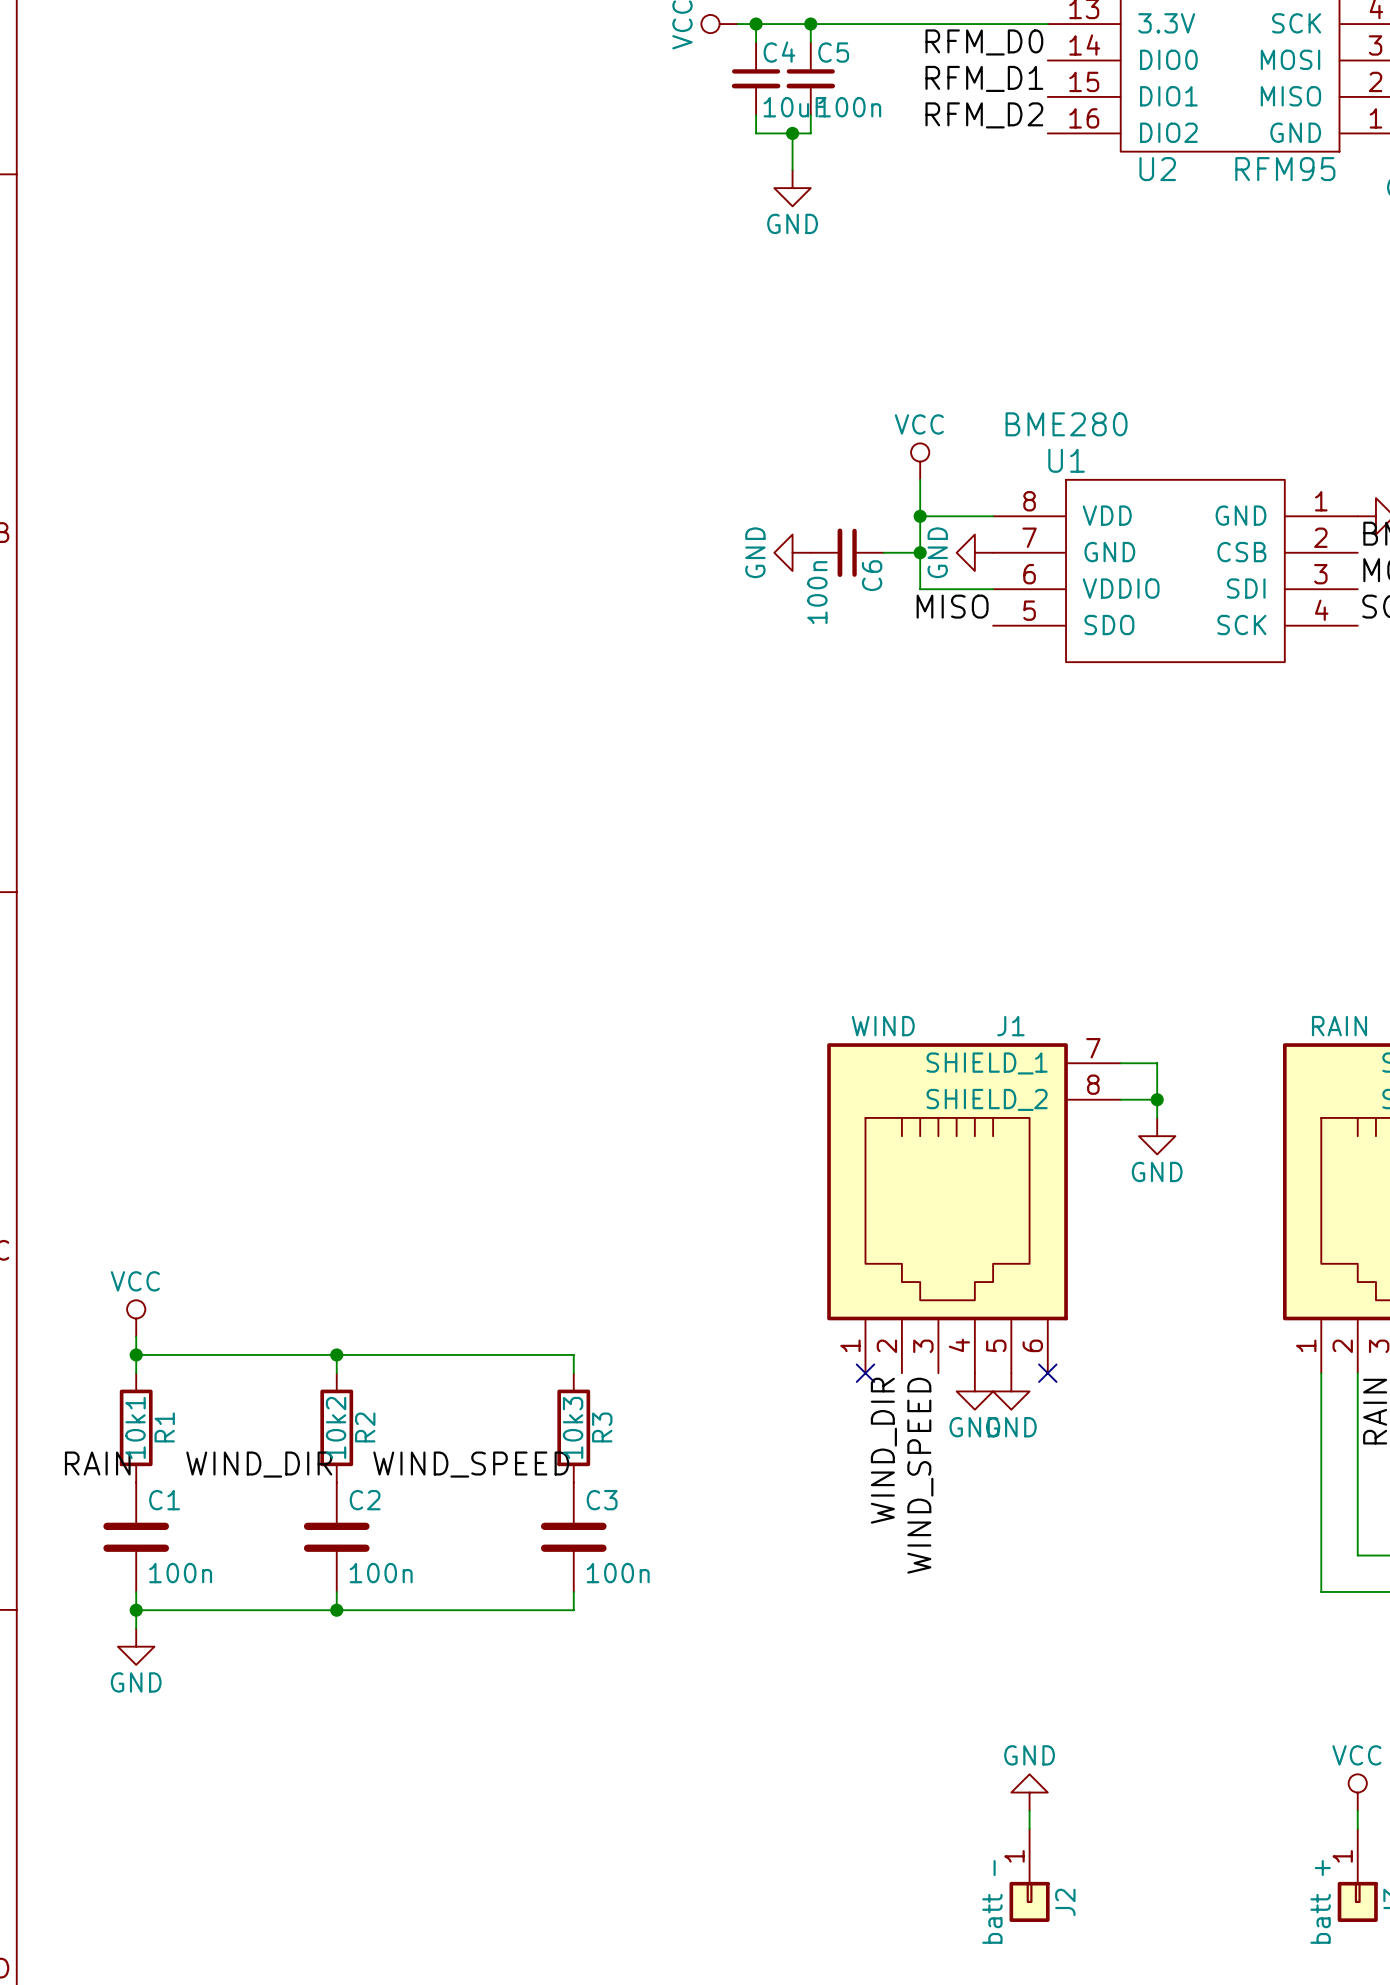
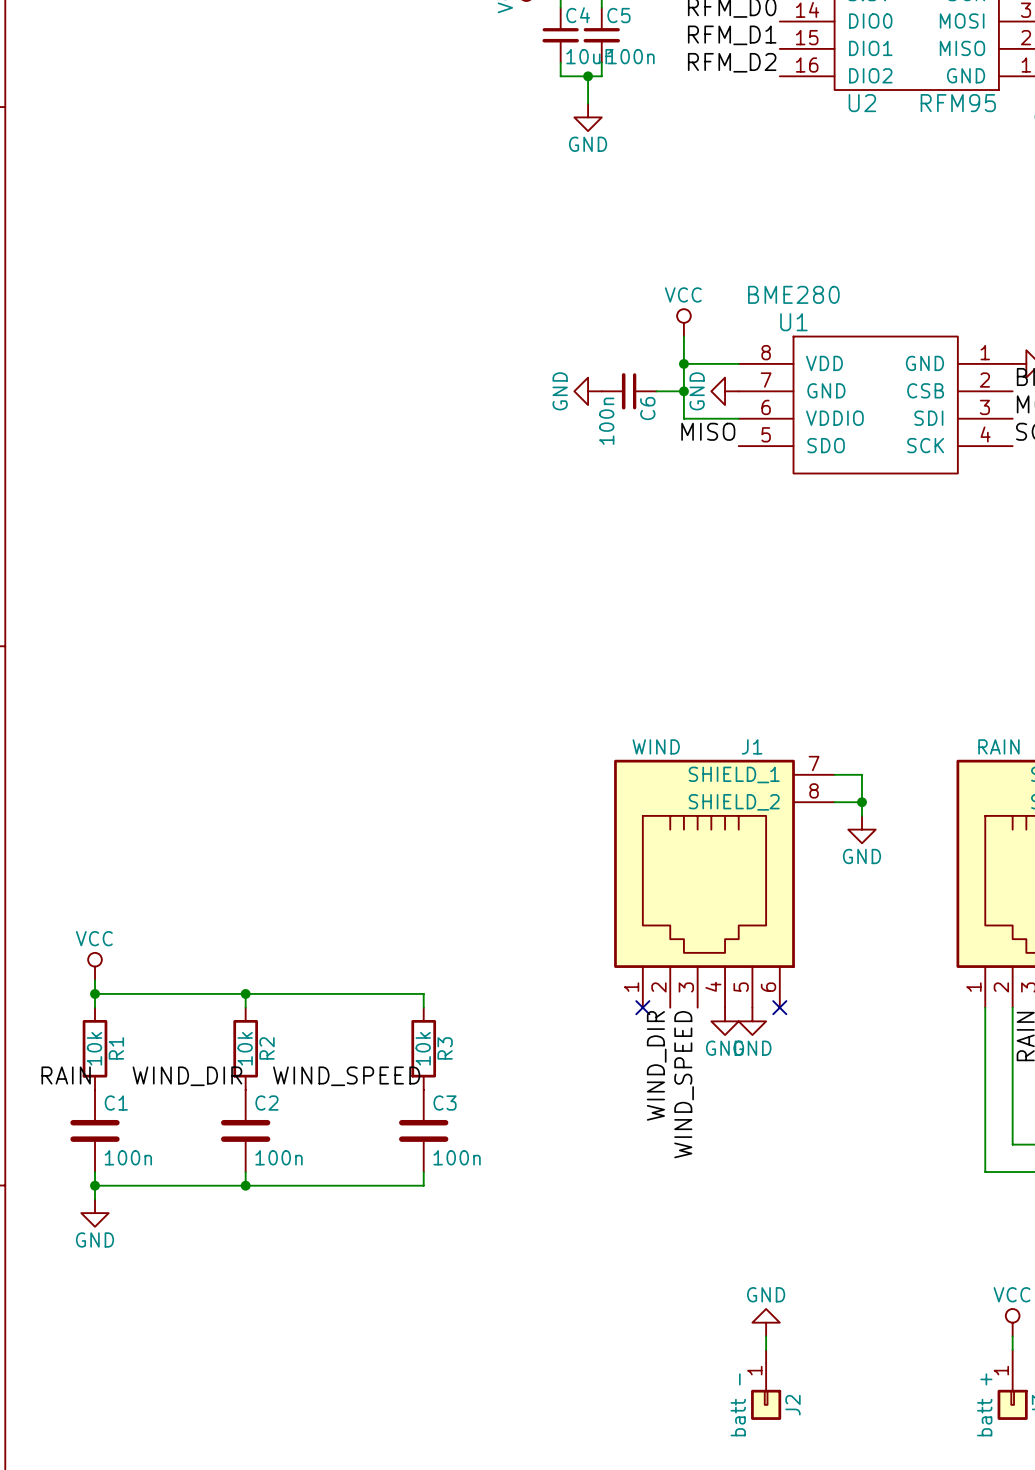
R1 value: 10k1 (135, 1427) -> 10k (94, 1048)
R2 value: 10k2 (336, 1427) -> 10k (245, 1048)
R3 value: 10k3 (573, 1427) -> 10k (423, 1048)

